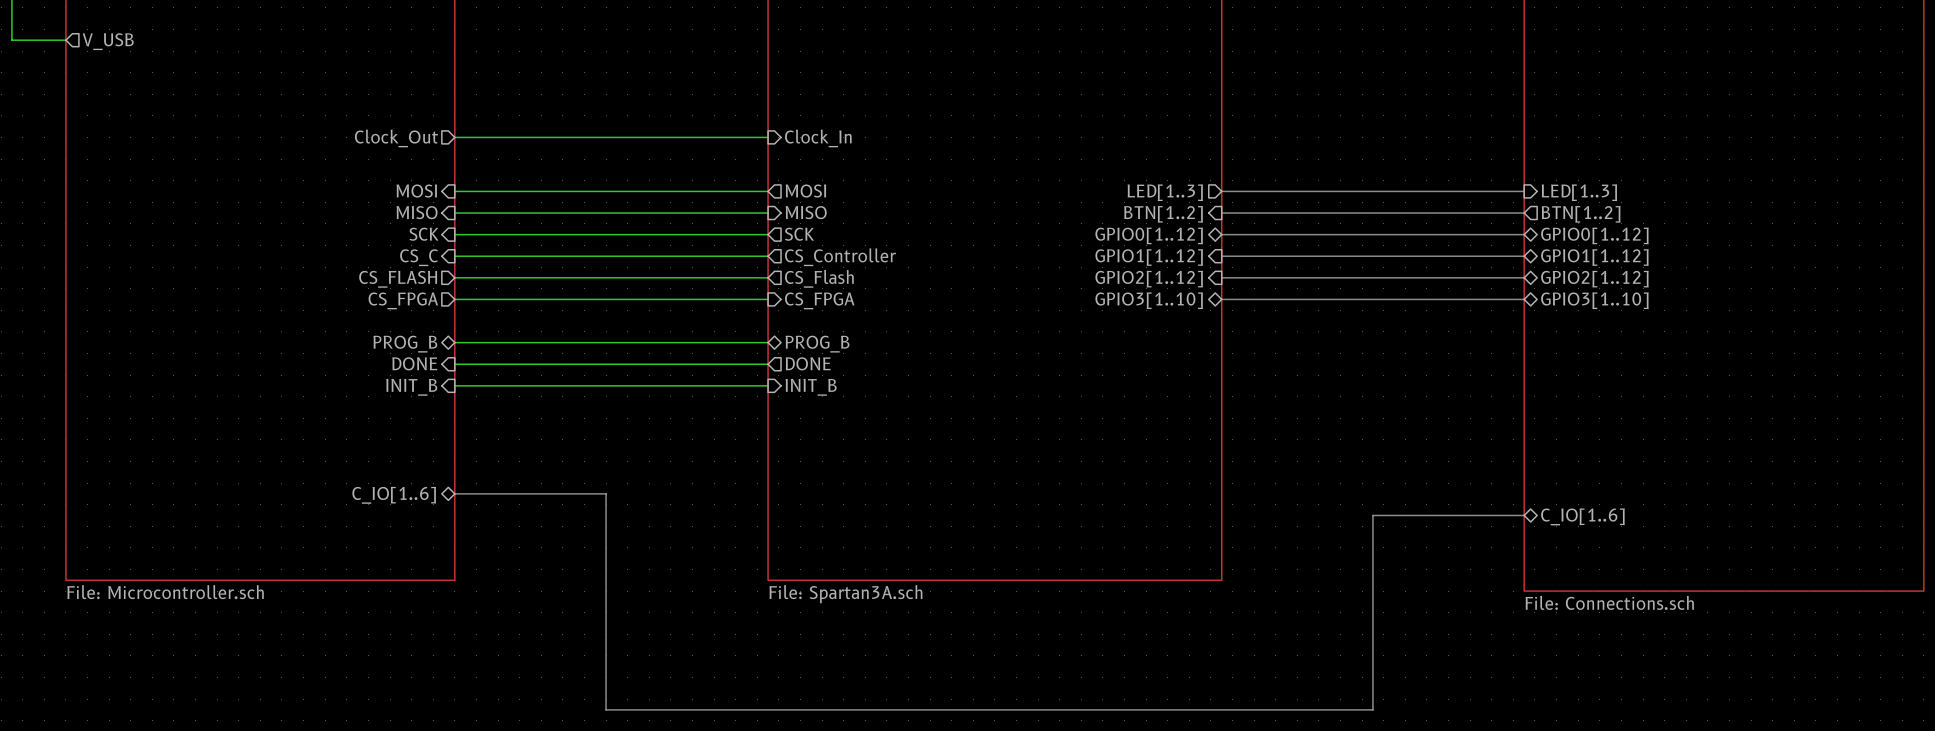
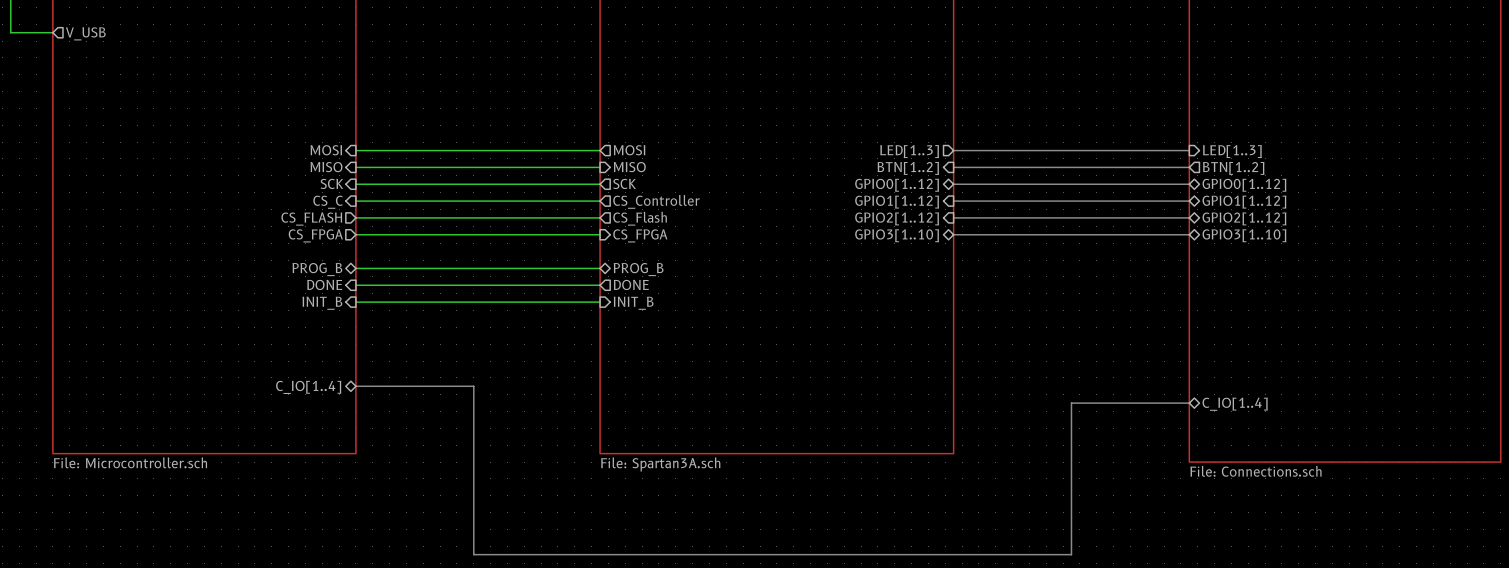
wire: (454, 137) (768, 137) -> none
sheet pin: Clock_Out (396, 138) -> none
sheet pin: Clock_In (818, 138) -> none
sheet pin: C_IO[1..6] (394, 495) -> C_IO[1..4] (308, 387)
sheet pin: C_IO[1..6] (1582, 516) -> C_IO[1..4] (1235, 404)

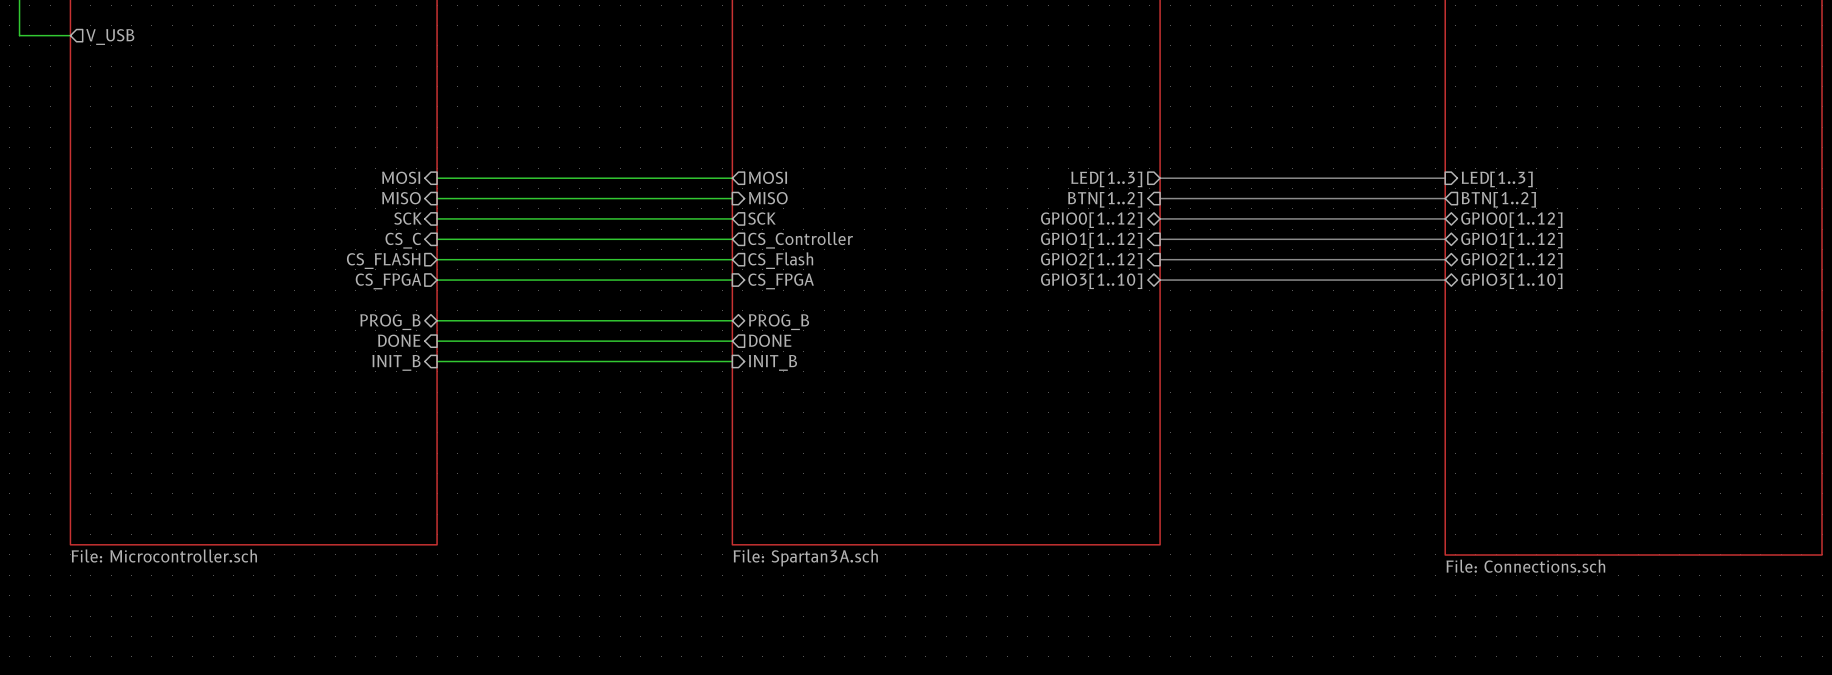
bus: (355, 386) (473, 386) (473, 554) (1071, 554) (1071, 403) (1189, 403) -> none
sheet pin: C_IO[1..4] (308, 387) -> none
sheet pin: C_IO[1..4] (1235, 404) -> none

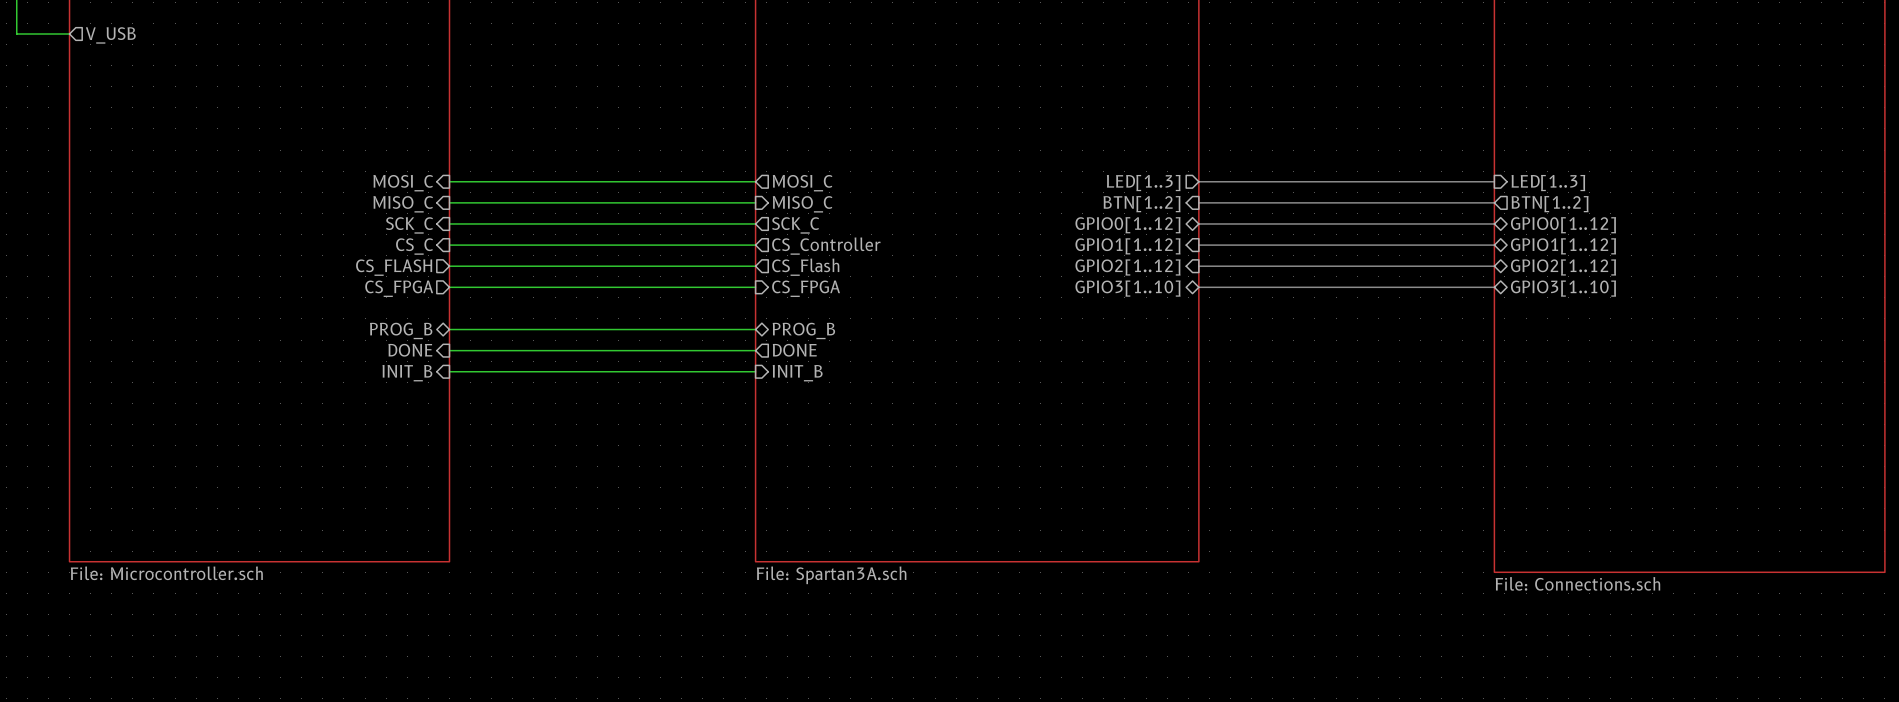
sheet pin: MOSI (401, 177) -> MOSI_C (403, 183)
sheet pin: MOSI (768, 177) -> MOSI_C (802, 183)
sheet pin: MISO (401, 198) -> MISO_C (403, 204)
sheet pin: MISO (768, 198) -> MISO_C (802, 204)
sheet pin: SCK (407, 218) -> SCK_C (409, 225)
sheet pin: SCK (762, 218) -> SCK_C (795, 225)

